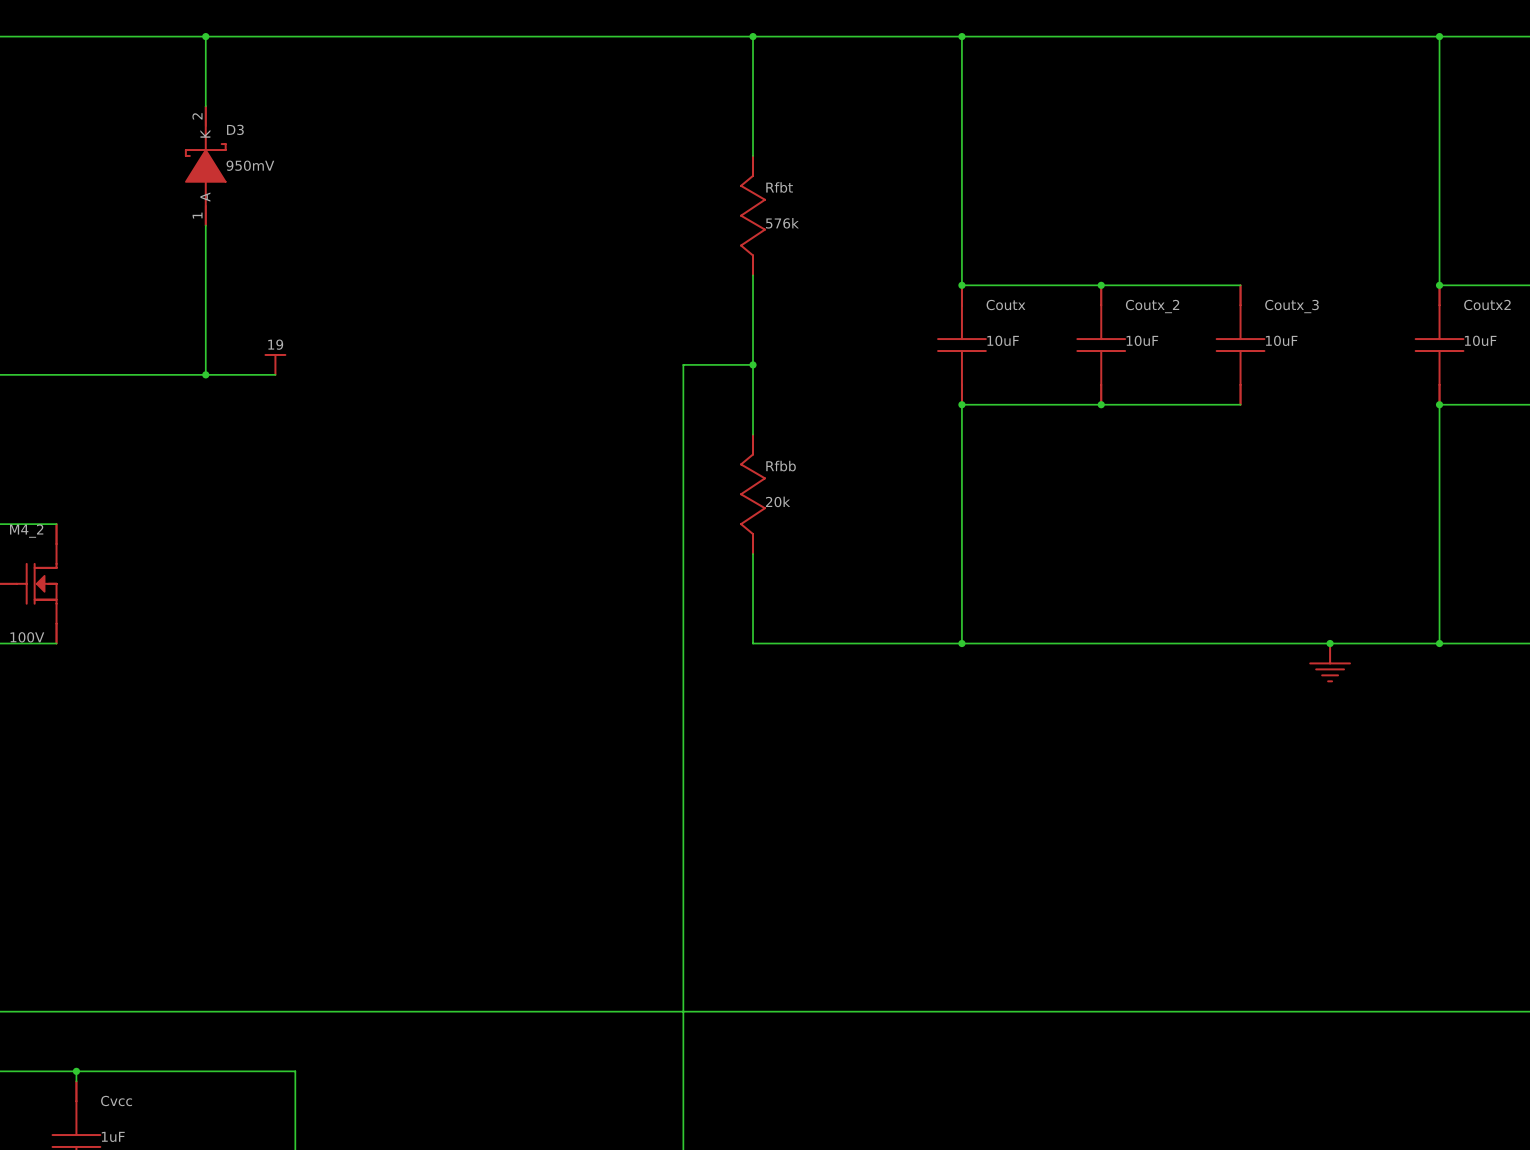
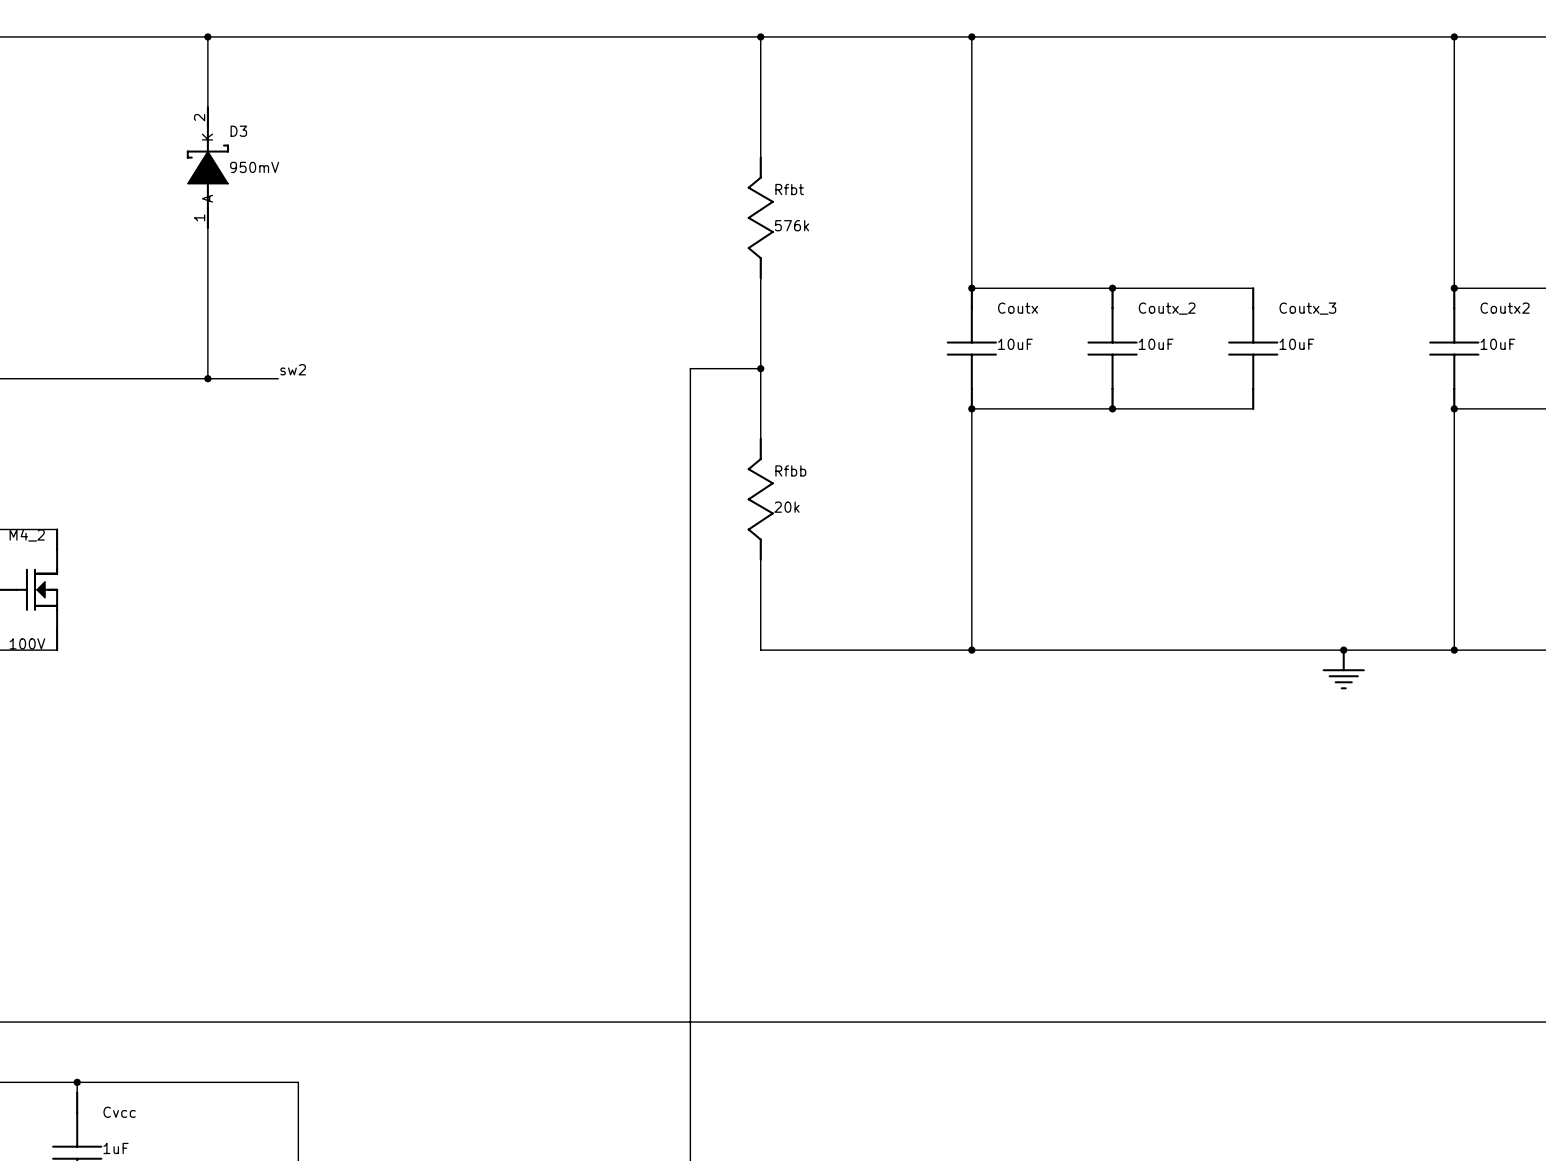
power symbol: 19 (275, 364) -> none
label: none -> sw2 (293, 369)

